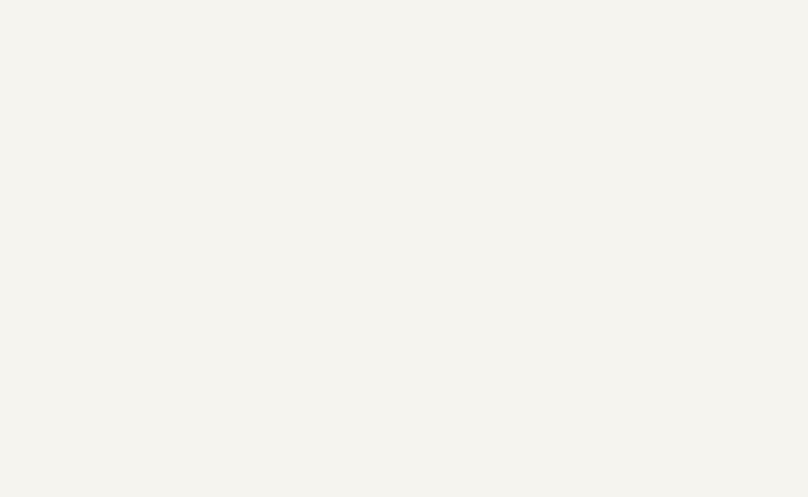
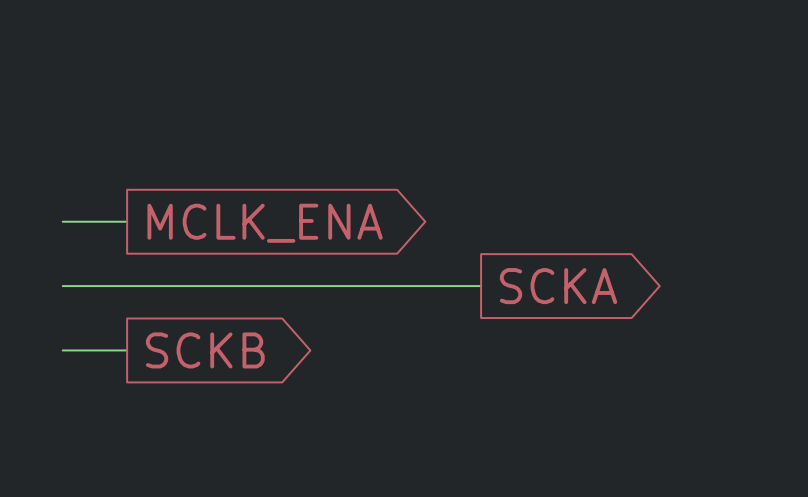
wire: none -> (62, 221) (127, 221)
global label: none -> MCLK_ENA (265, 223)
wire: none -> (62, 286) (481, 286)
global label: none -> SCKA (558, 286)
wire: none -> (62, 350) (127, 350)
global label: none -> SCKB (205, 350)

